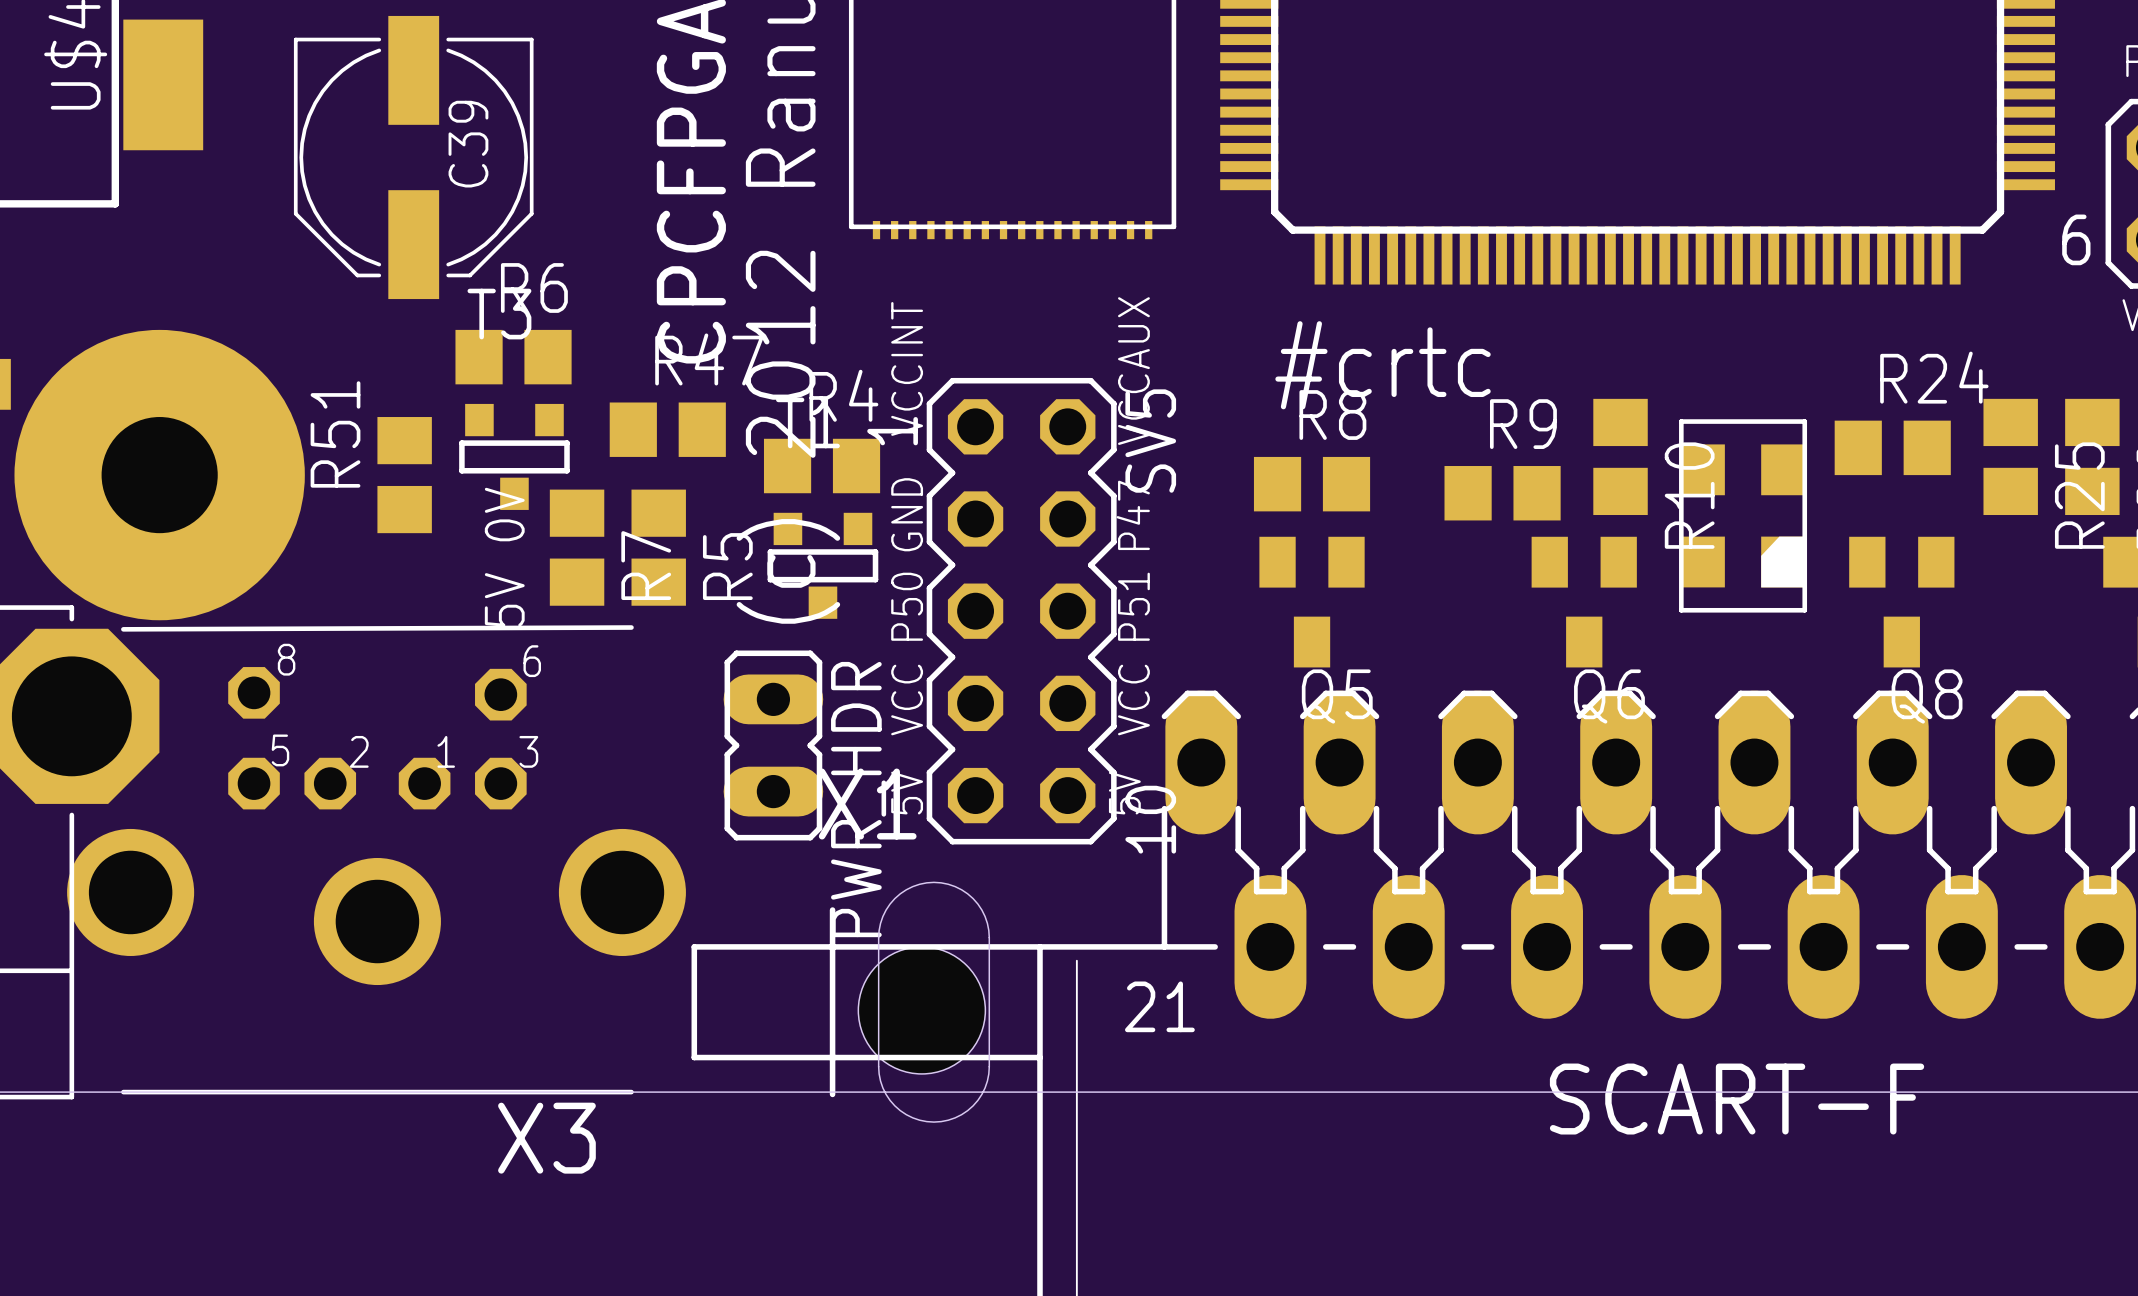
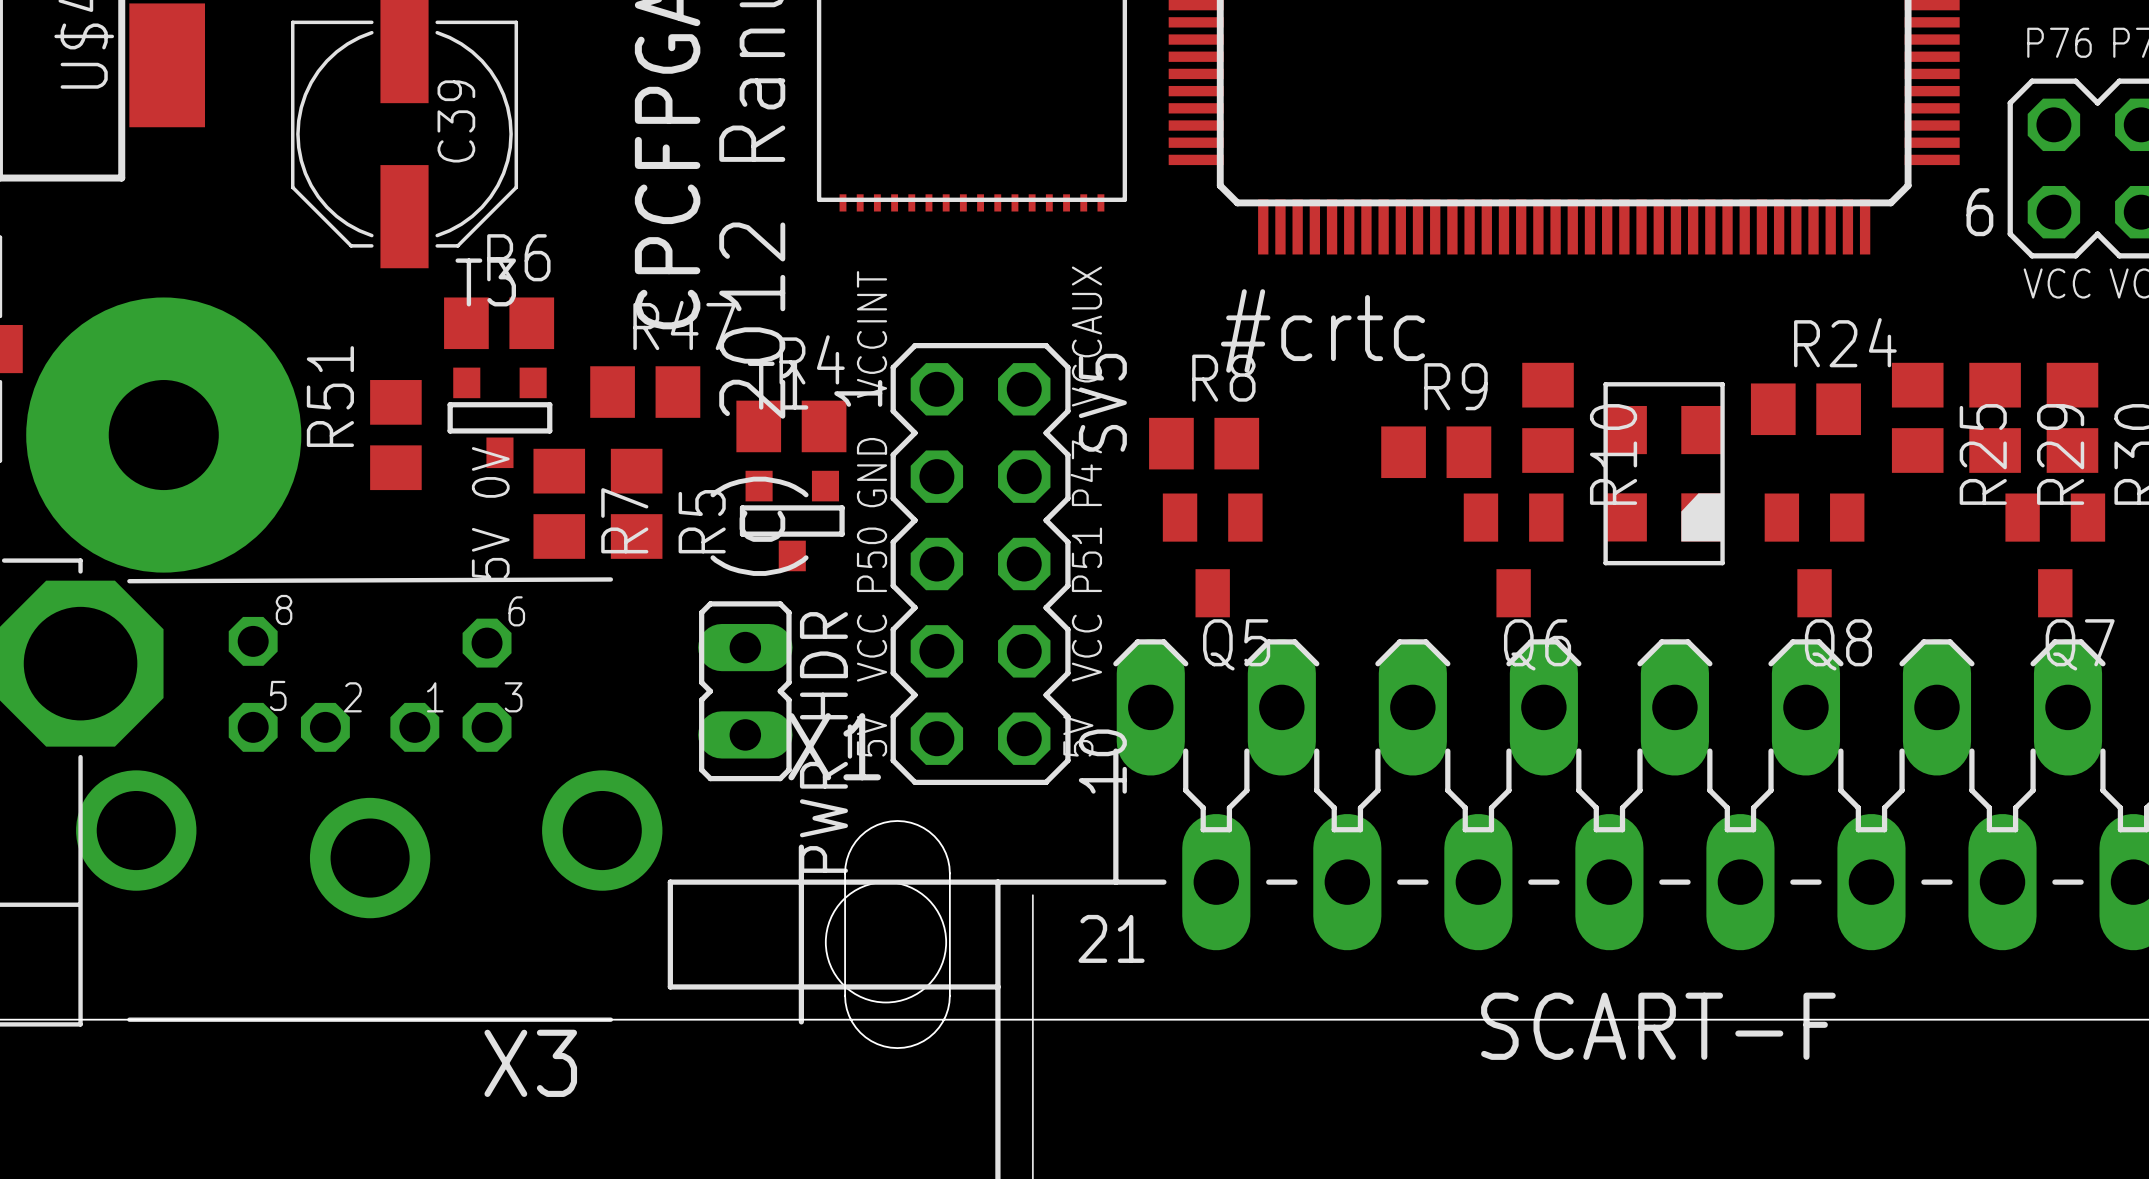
R8 position: (1312, 484) -> (1204, 443)
Q5 position: (1312, 602) -> (1212, 555)

